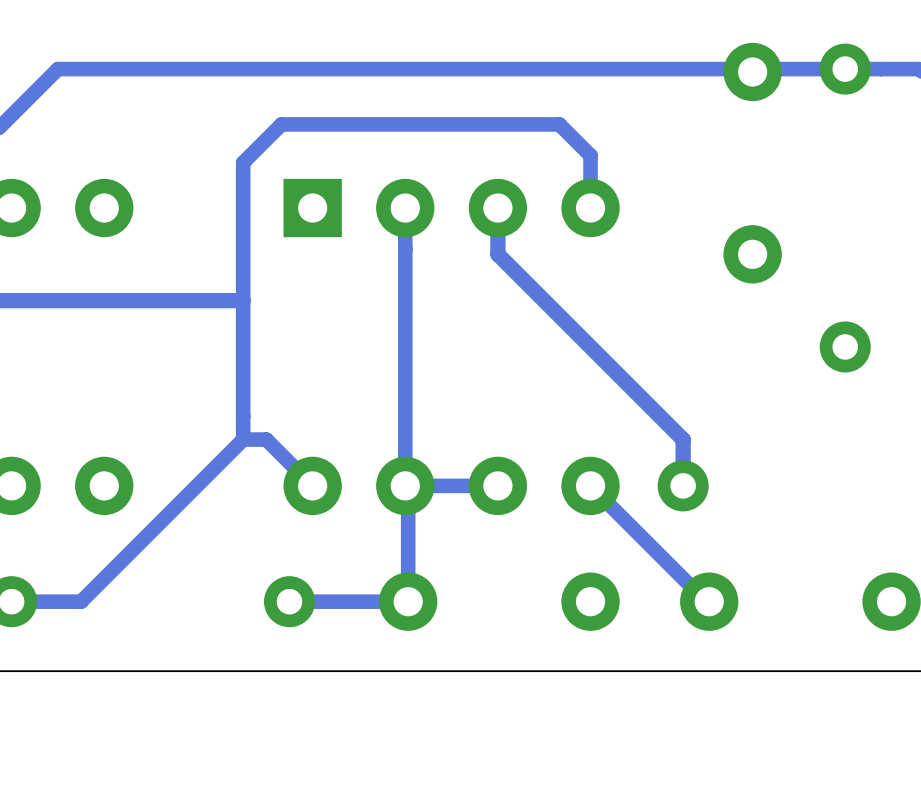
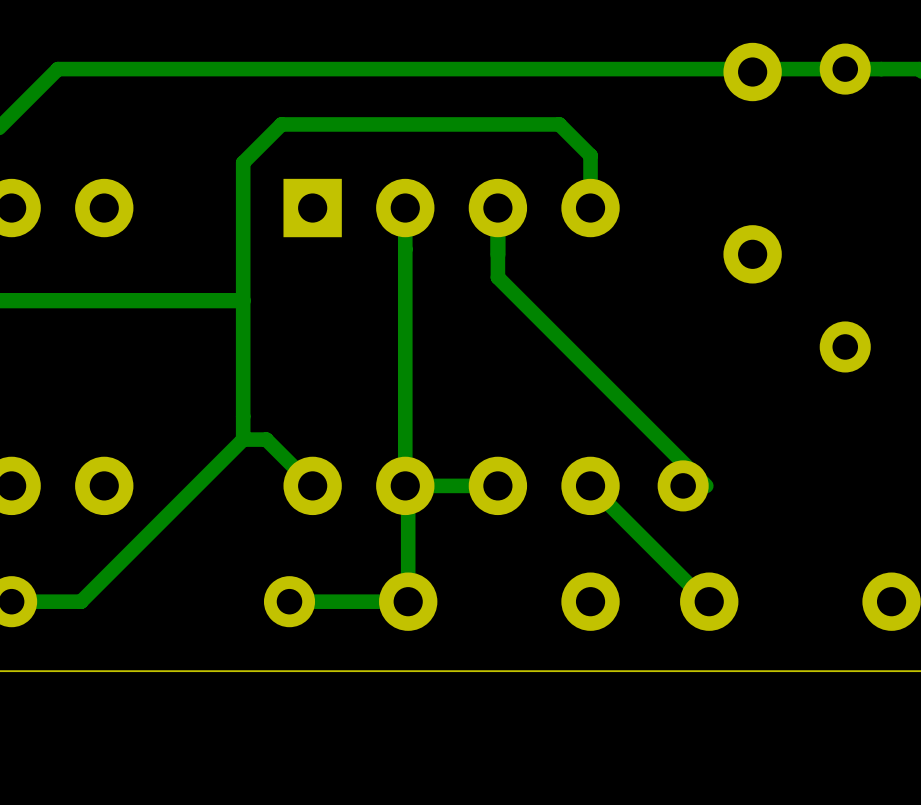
track: (497, 254) (683, 439) (683, 485) -> (497, 254) (497, 277) (706, 485)

